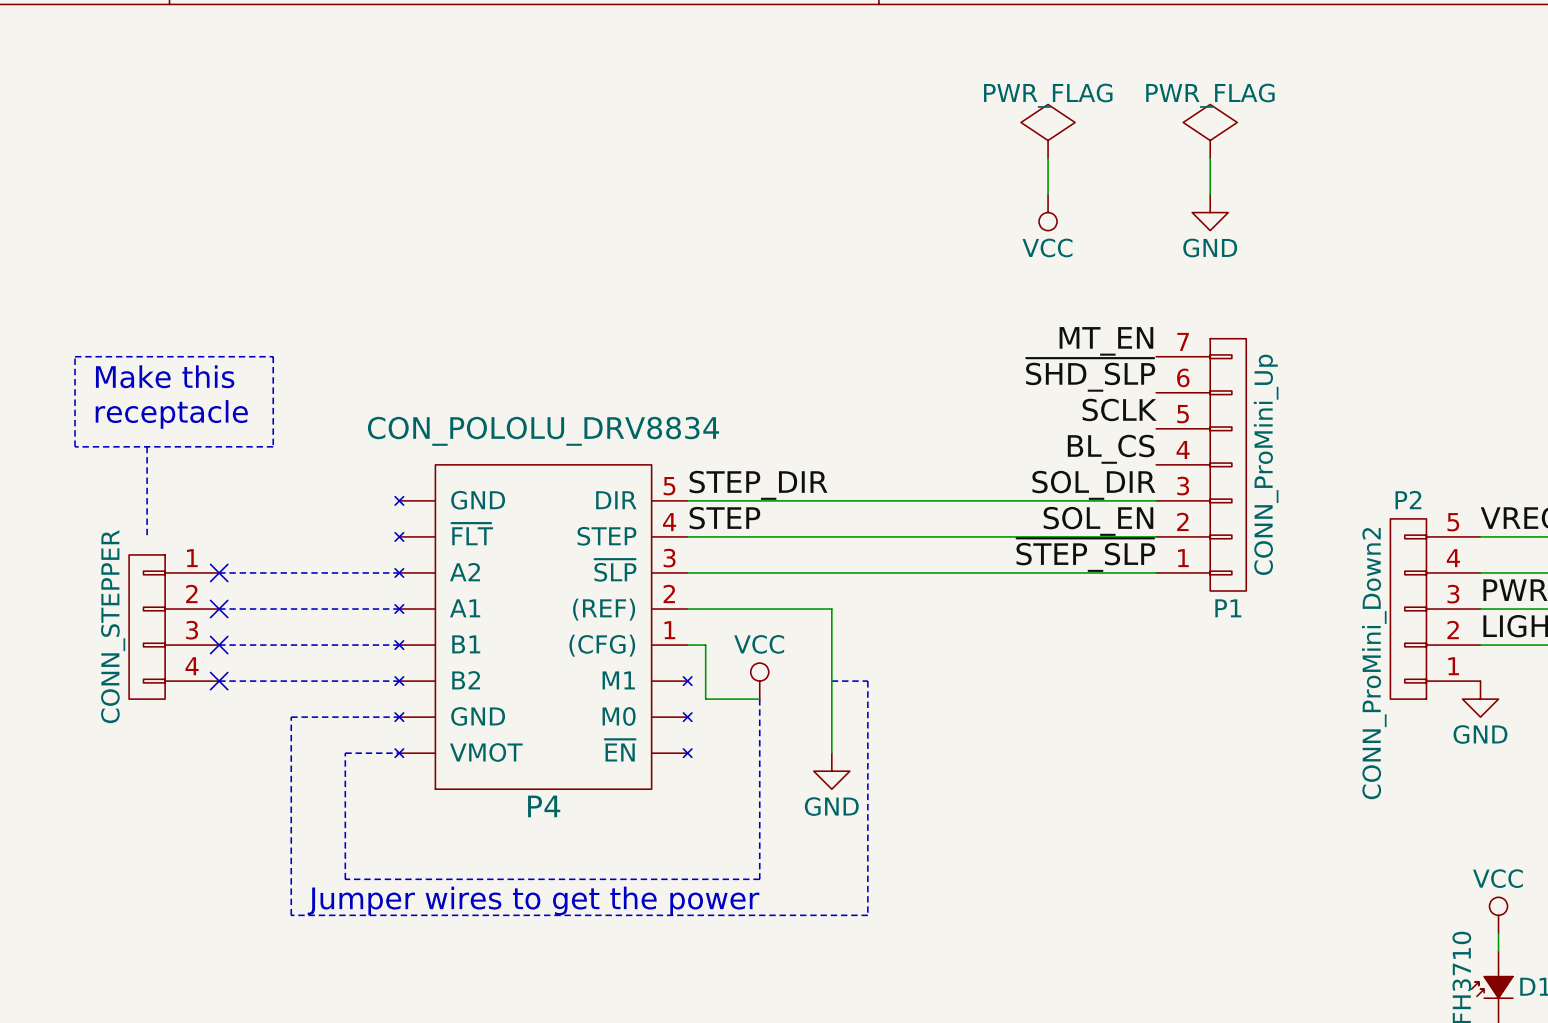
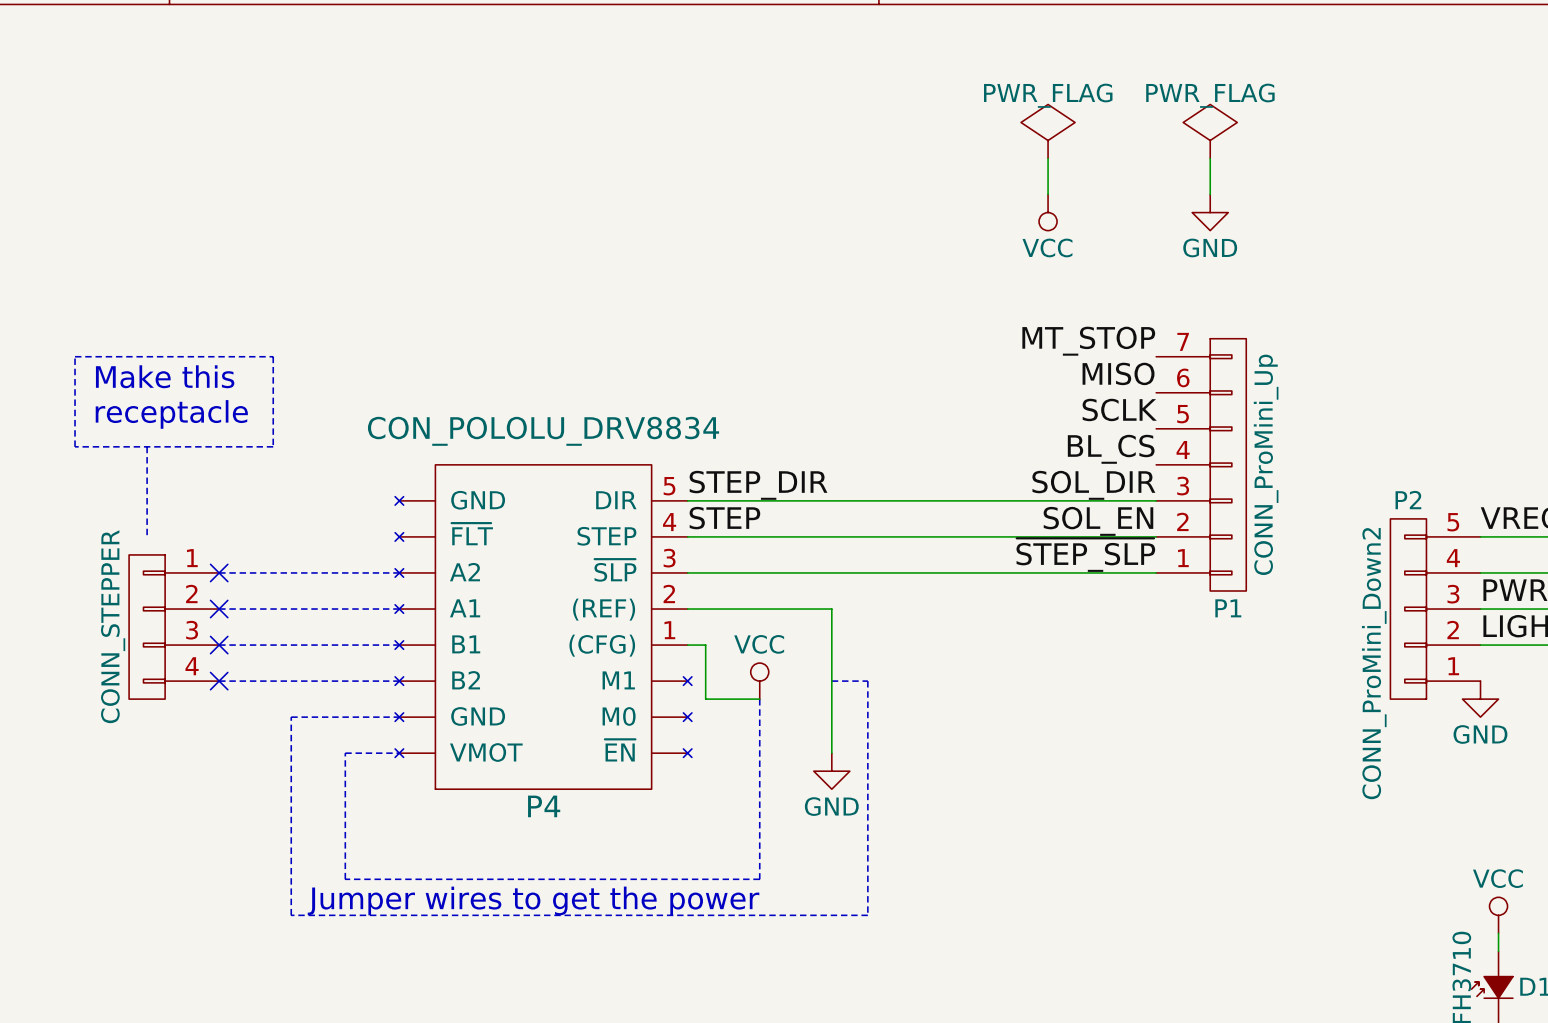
label: MT_EN (1106, 341) -> MT_STOP (1088, 341)
label: ~{SHD_SLP} (1090, 374) -> MISO (1118, 373)

